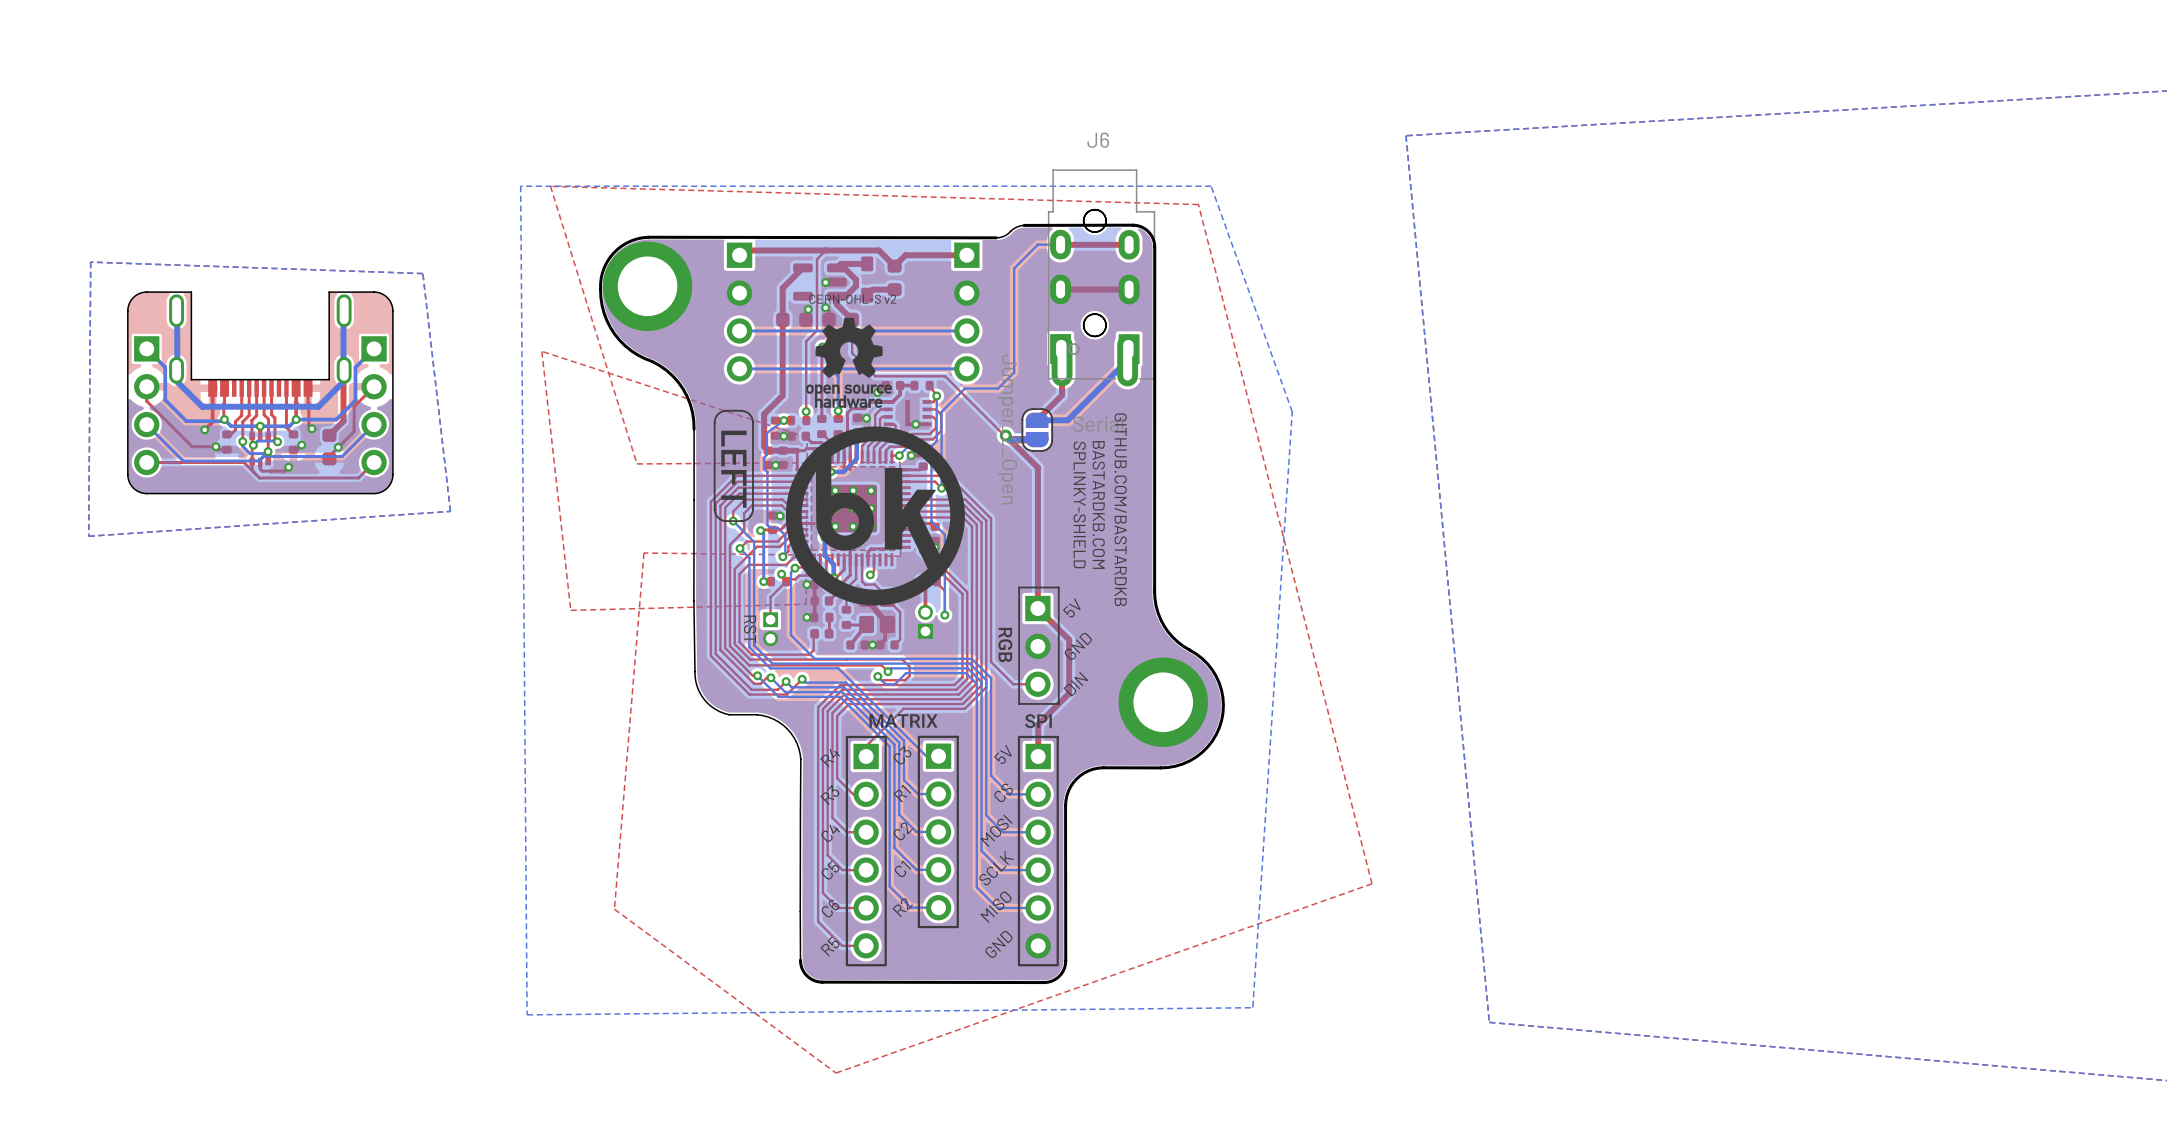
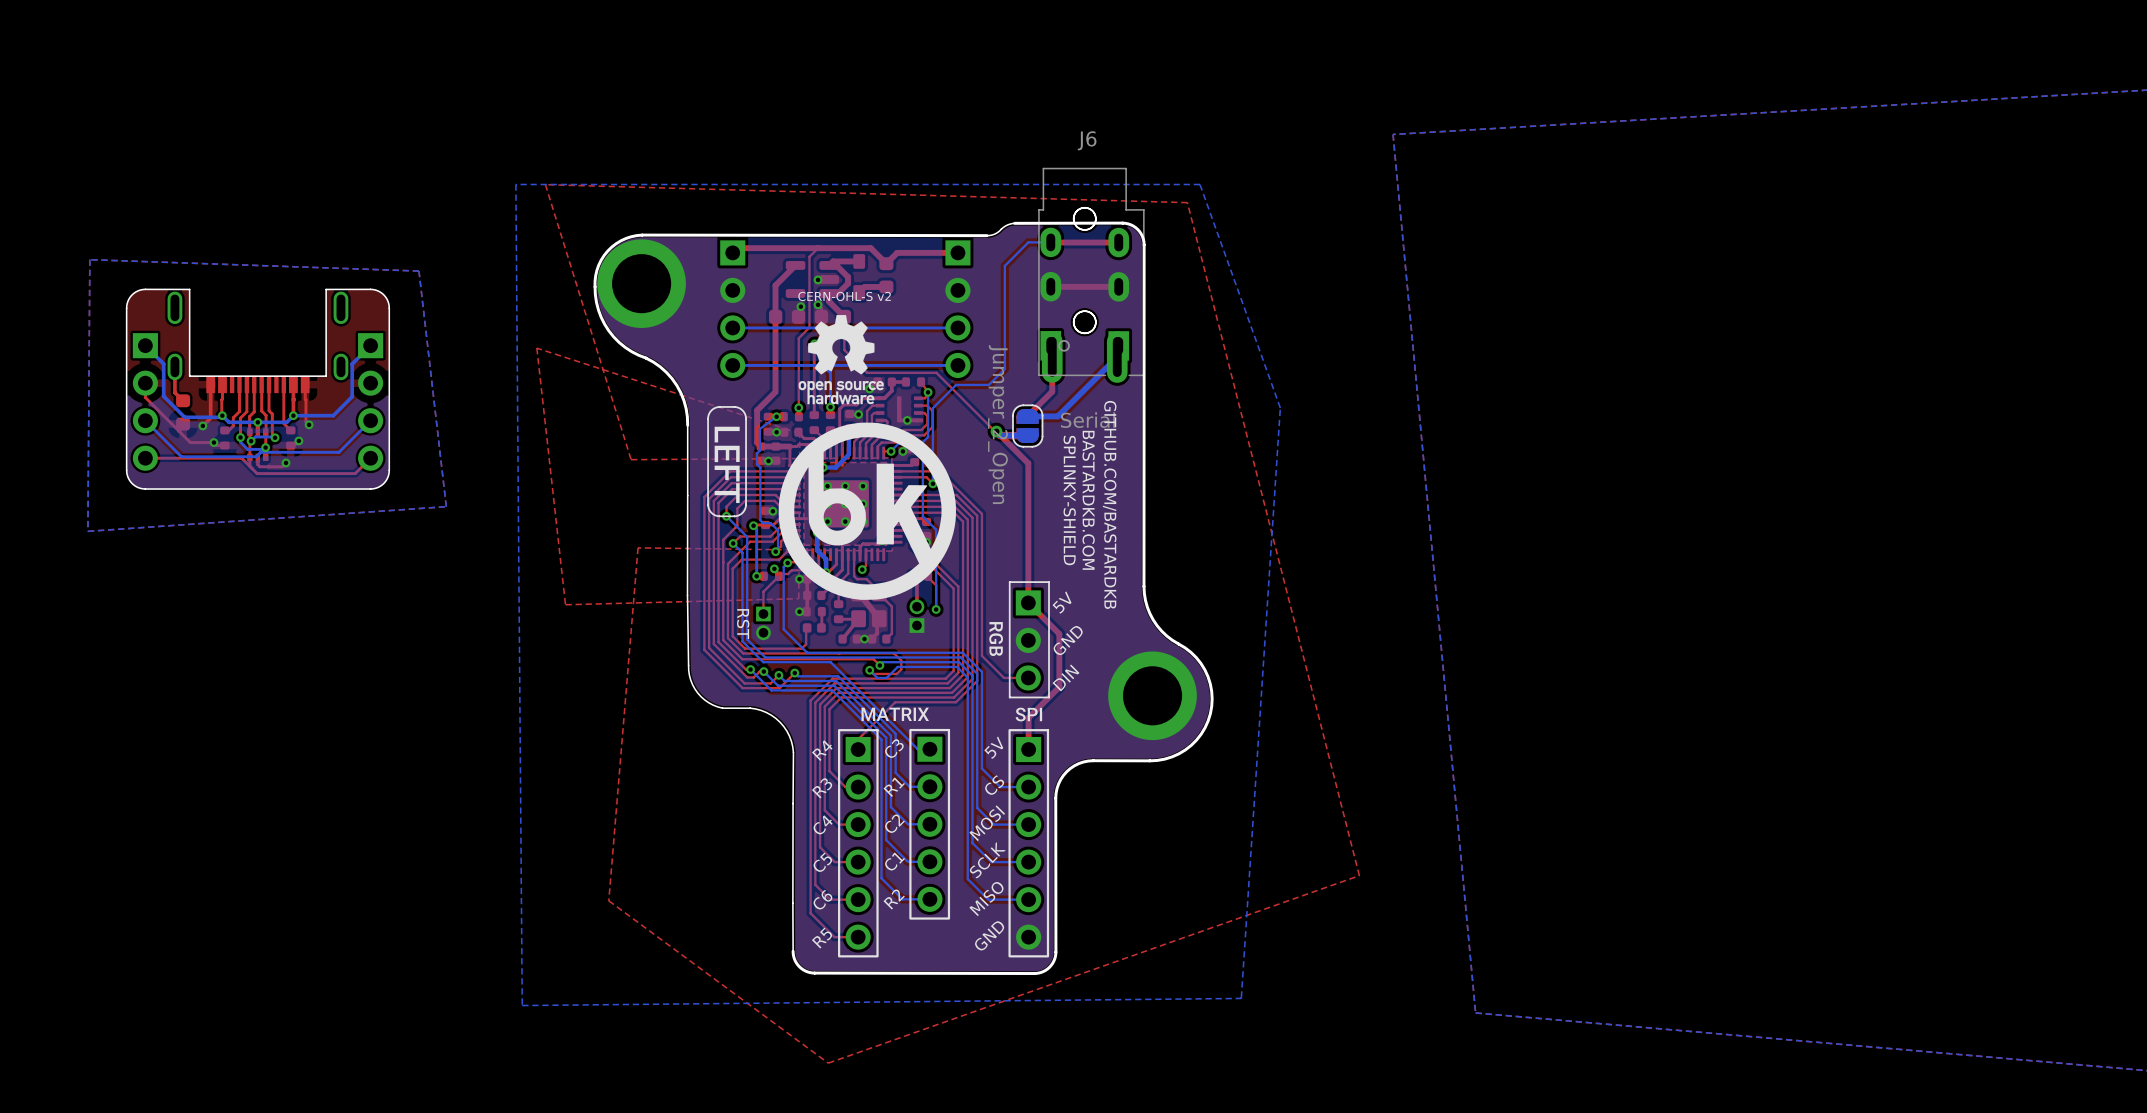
bottom track: (343, 313) (343, 381) (318, 406) (202, 406) (177, 381) (177, 313) -> none
top track: none -> (174, 366) (174, 392) (183, 400)
top track: (343, 381) (343, 421) (329, 435) -> none
top track: (374, 386) (354, 406) (354, 431) (329, 456) (329, 458) -> none
part position: (329, 447) -> (183, 412)
via: (338, 447) -> none

